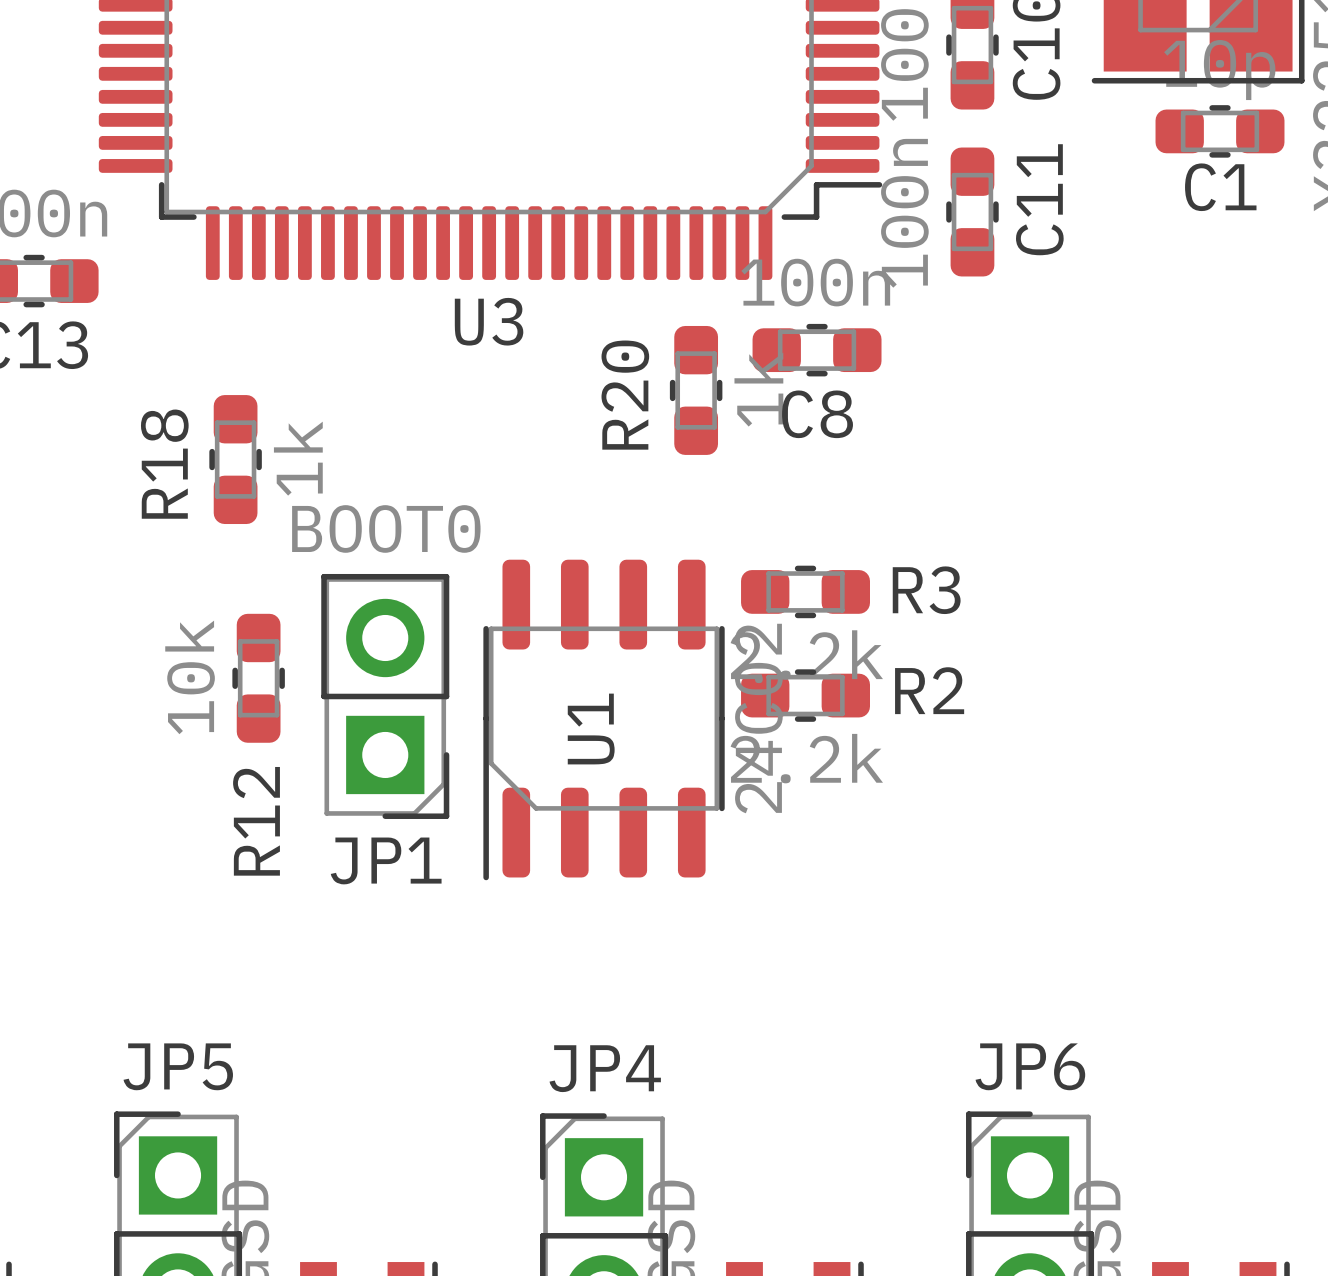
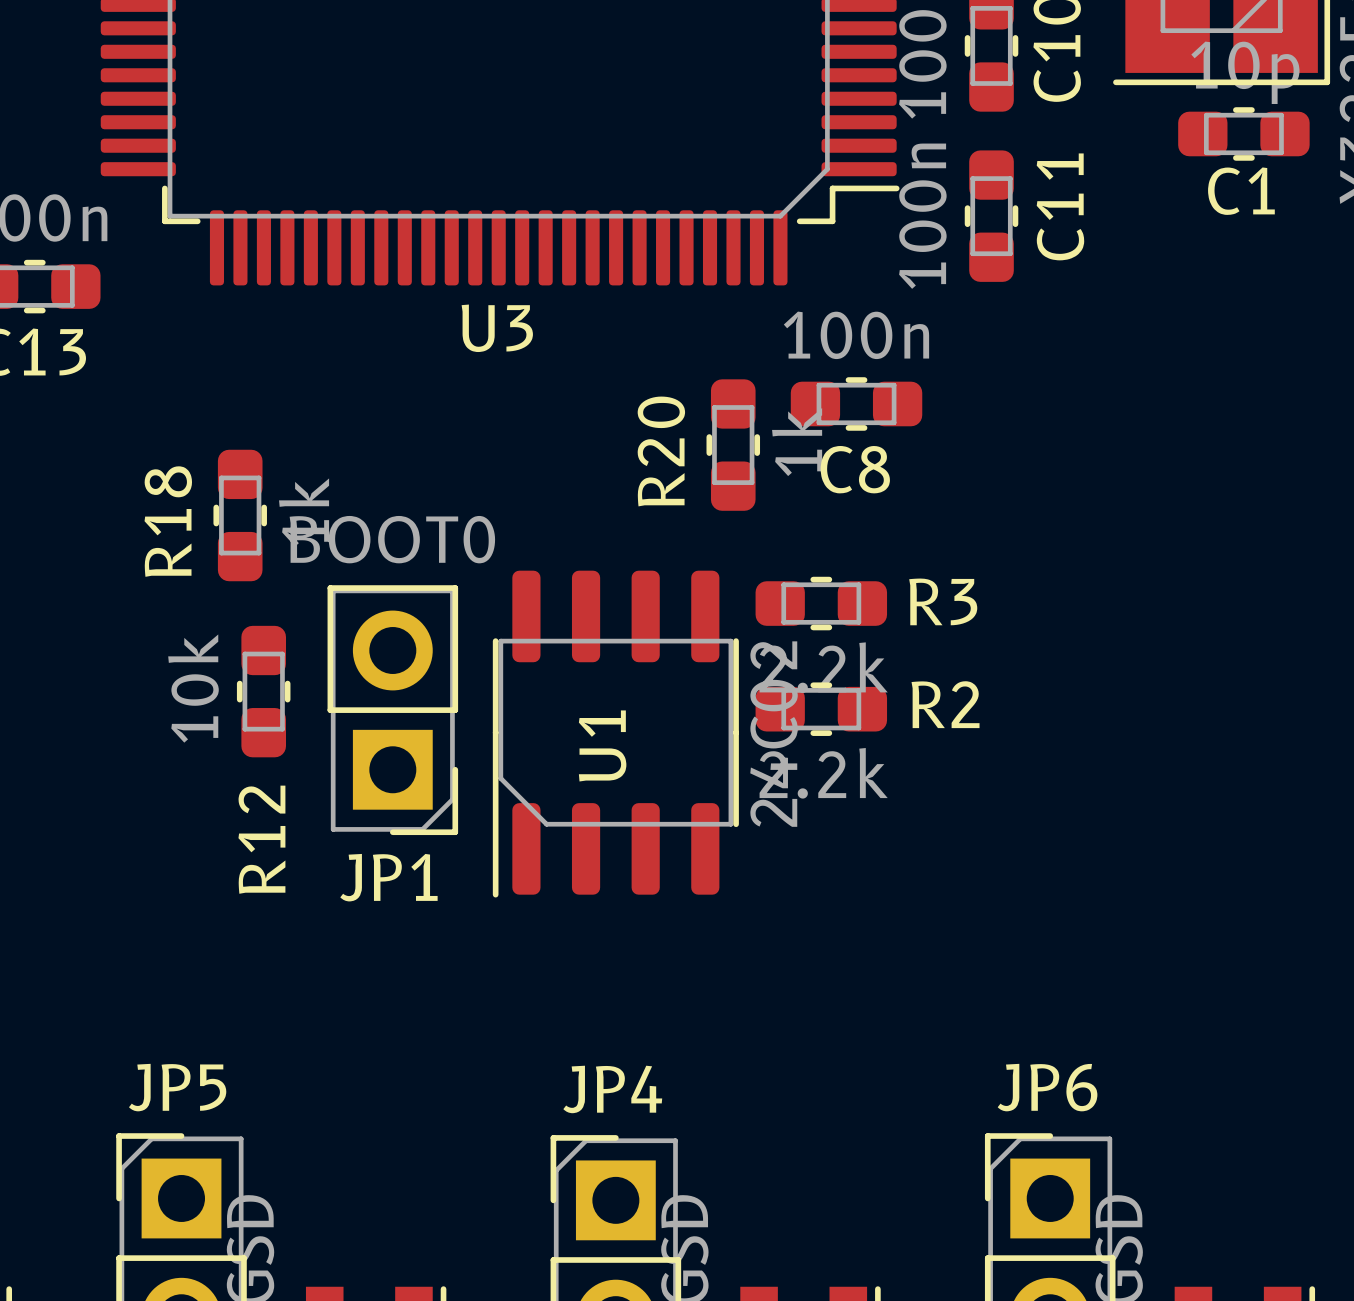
C8 position: (817, 350) -> (856, 403)
R20 position: (696, 390) -> (733, 445)
R18 position: (235, 459) -> (240, 515)

